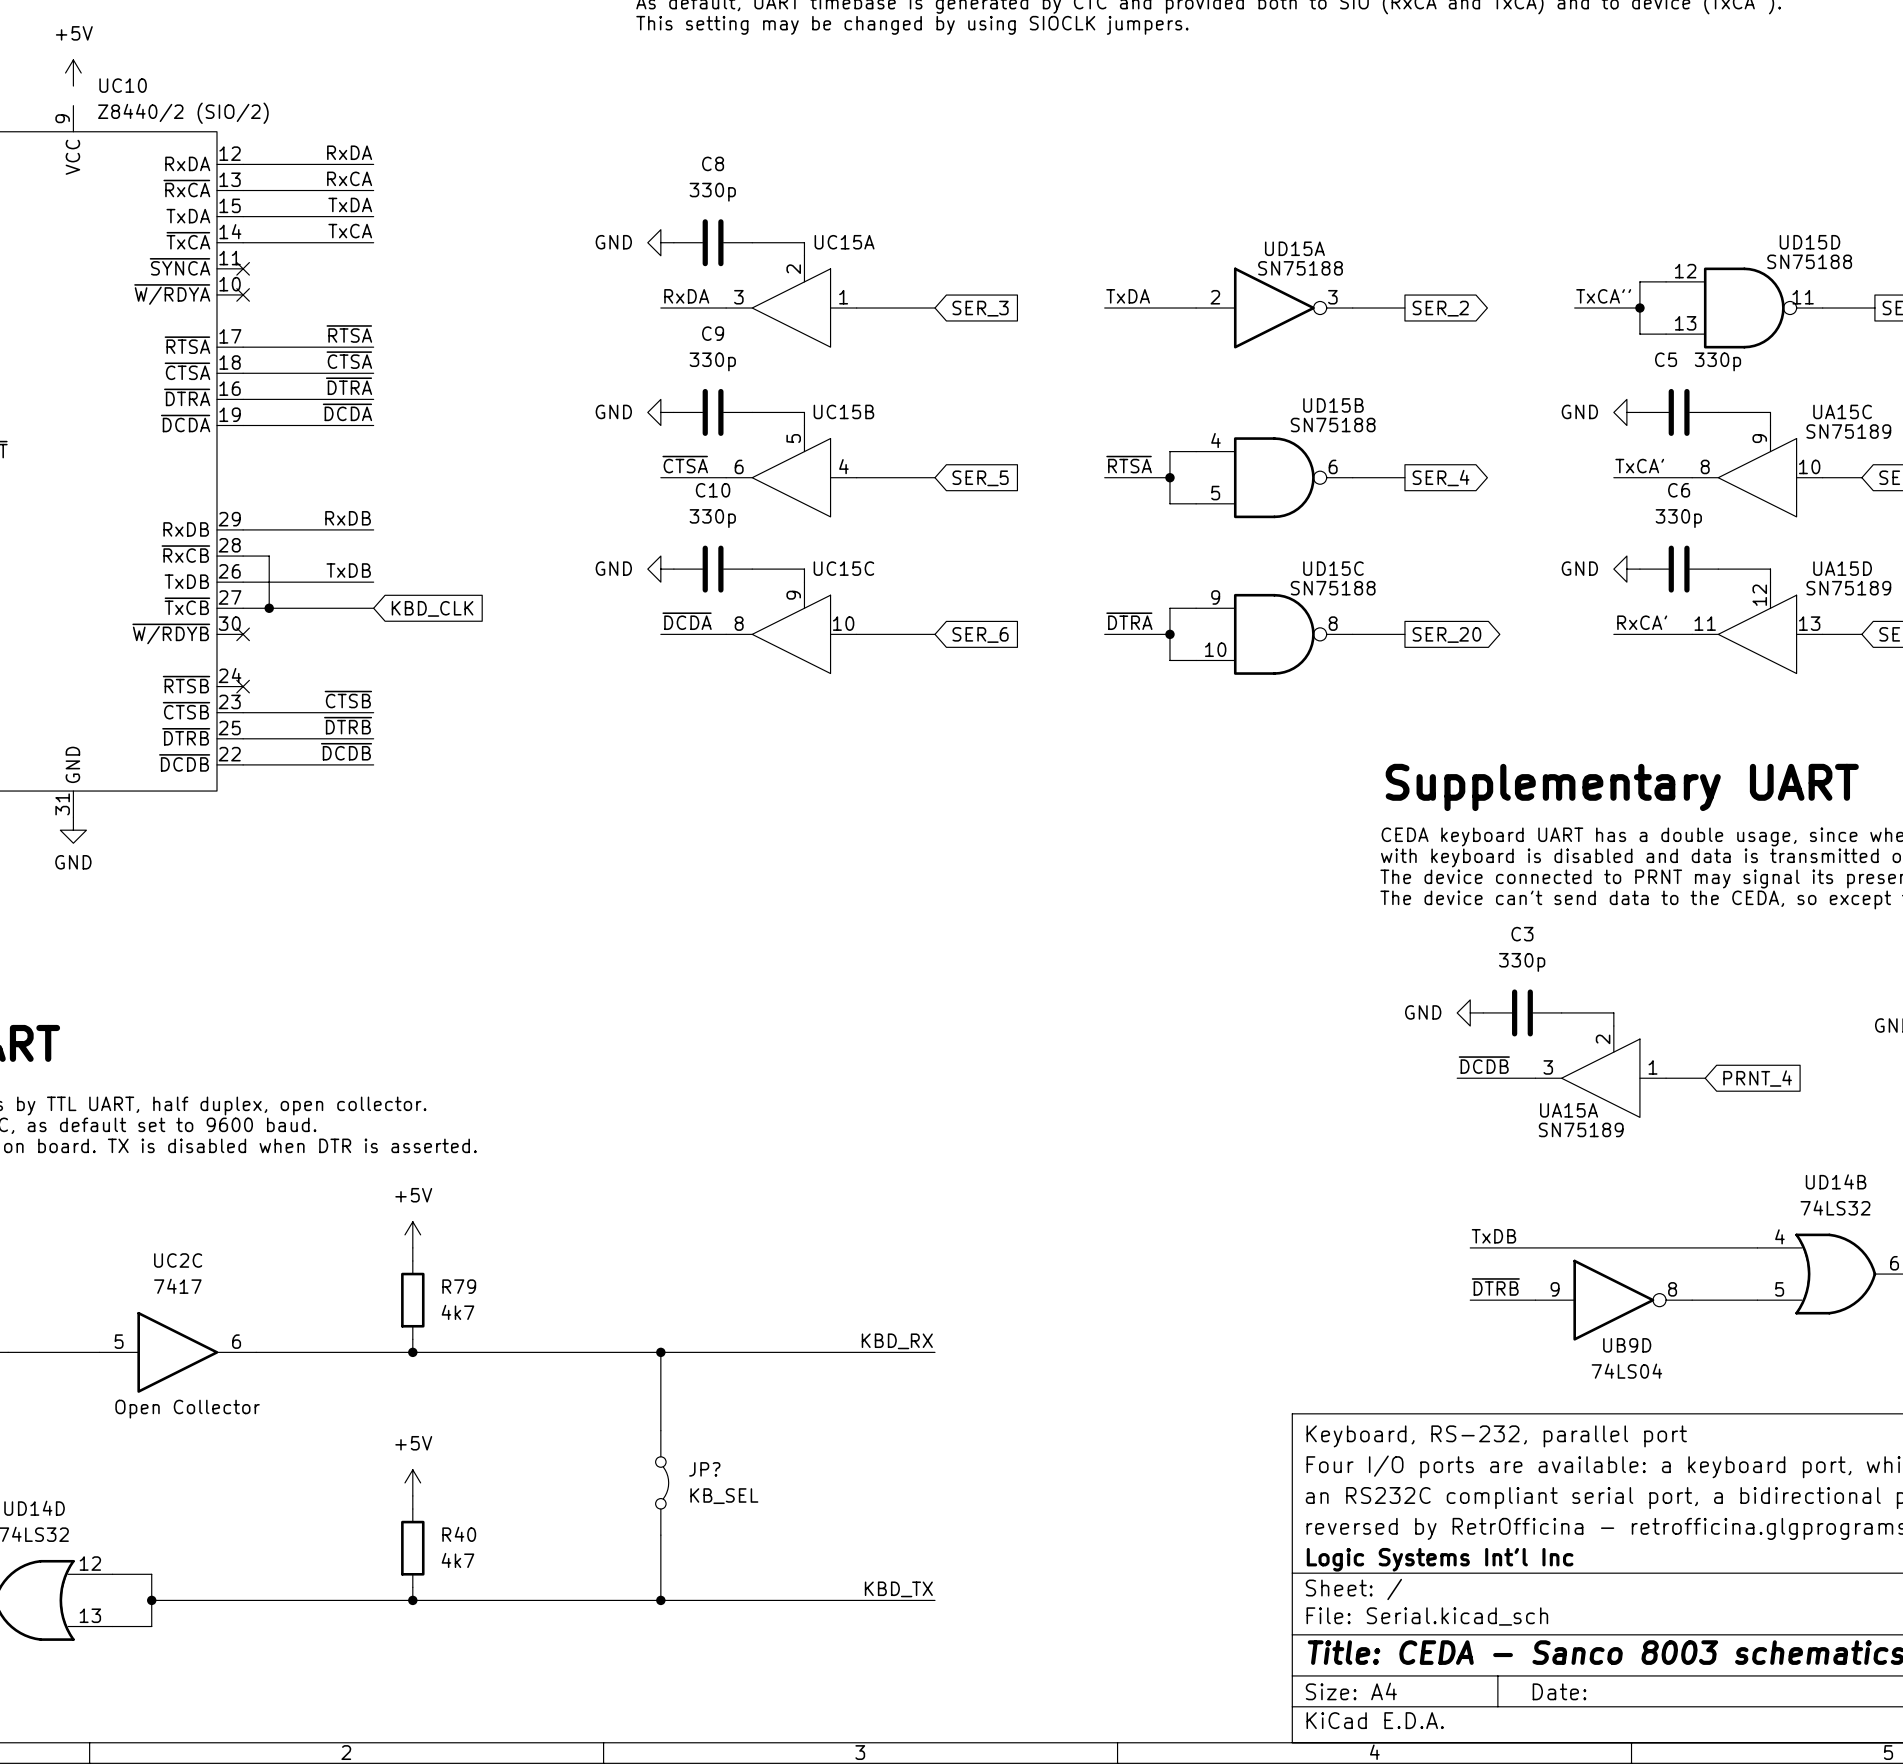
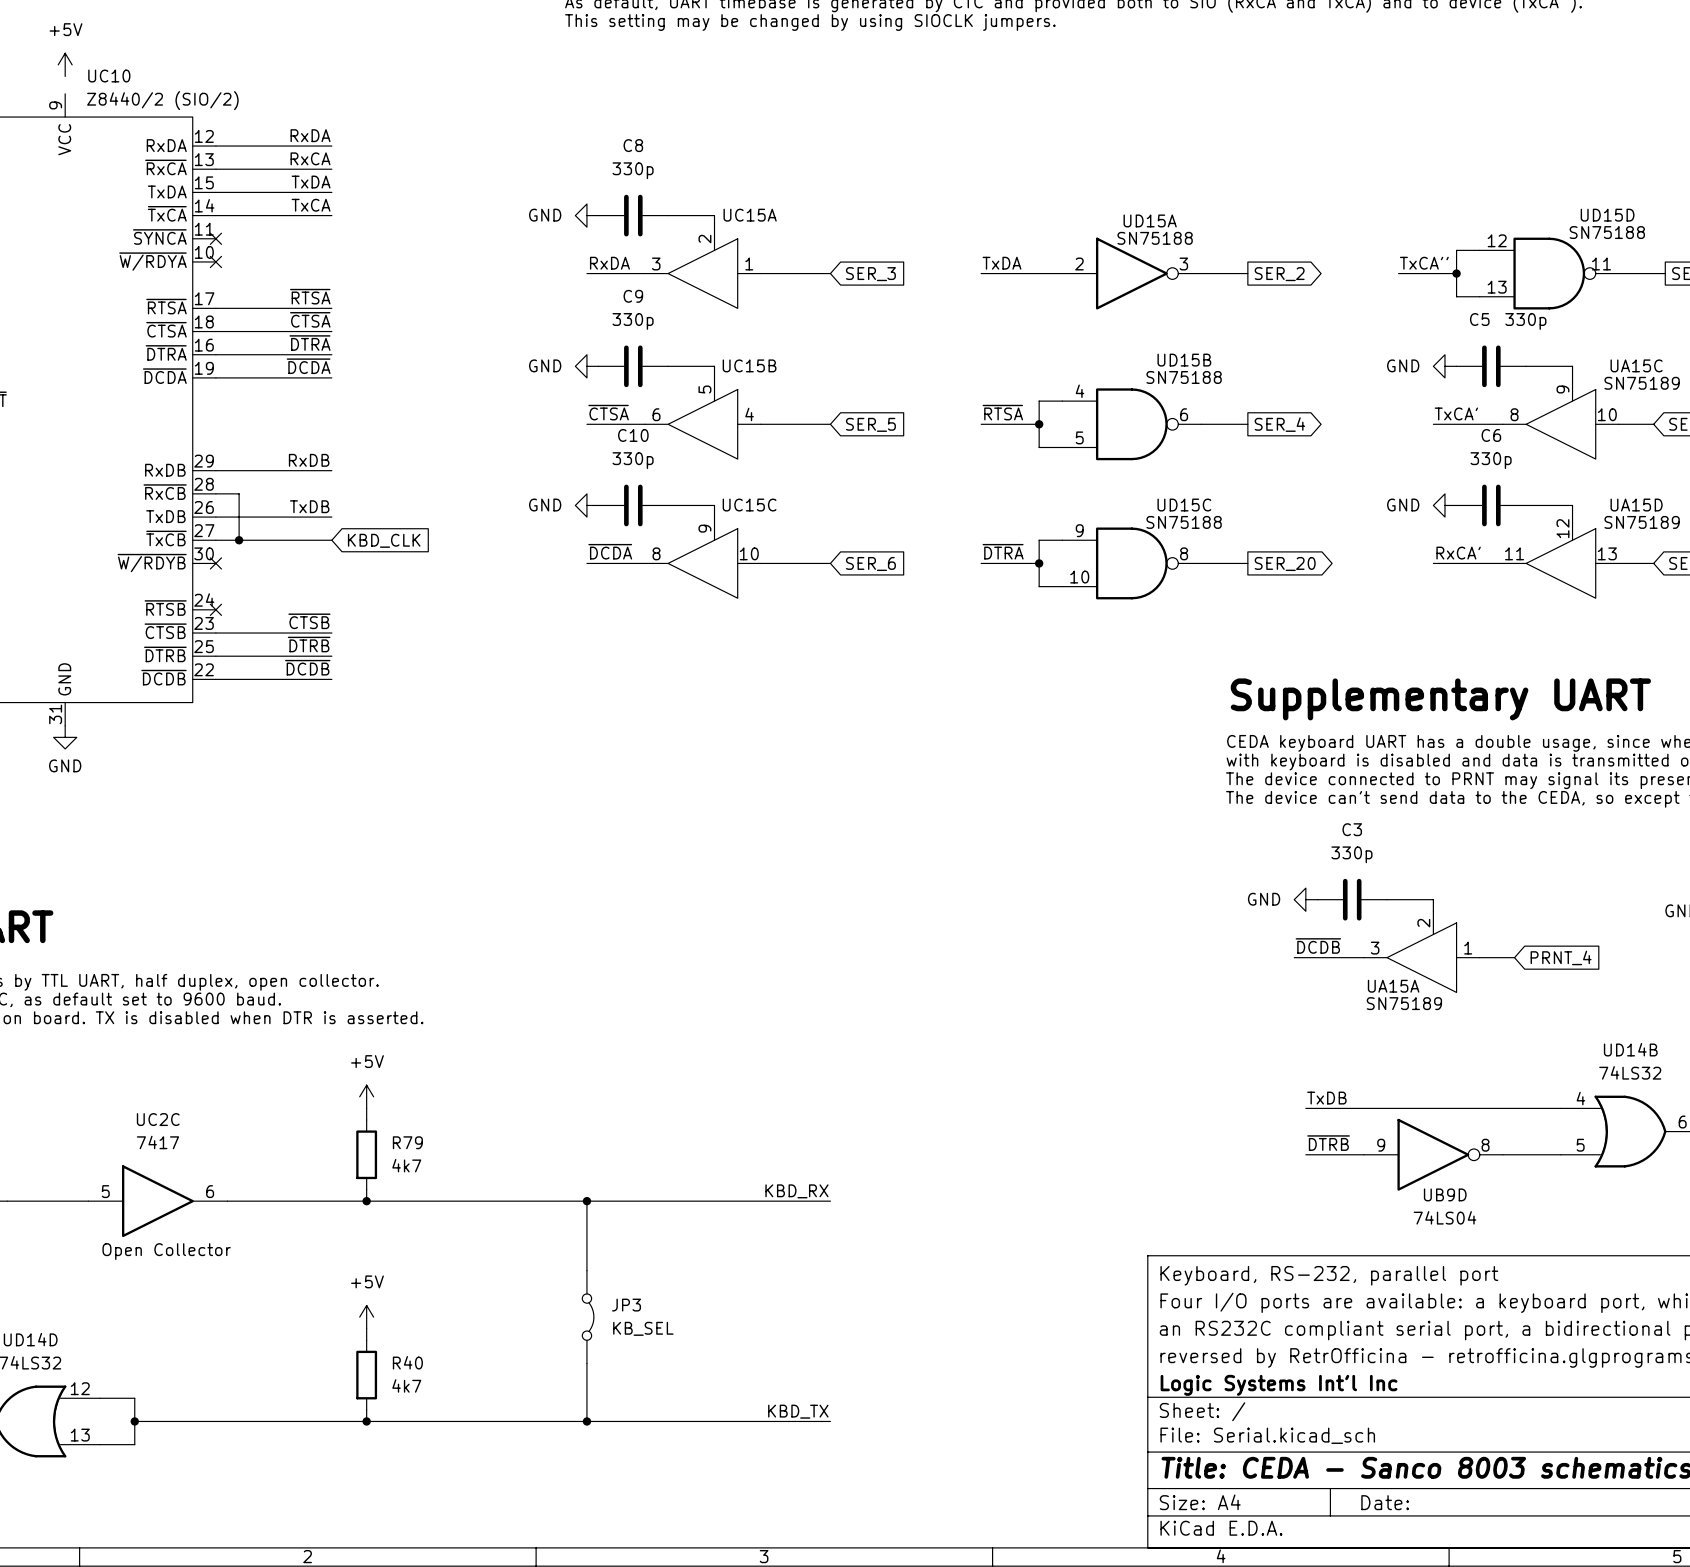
JP? name: JP? (704, 1469) -> JP3 (626, 1305)

